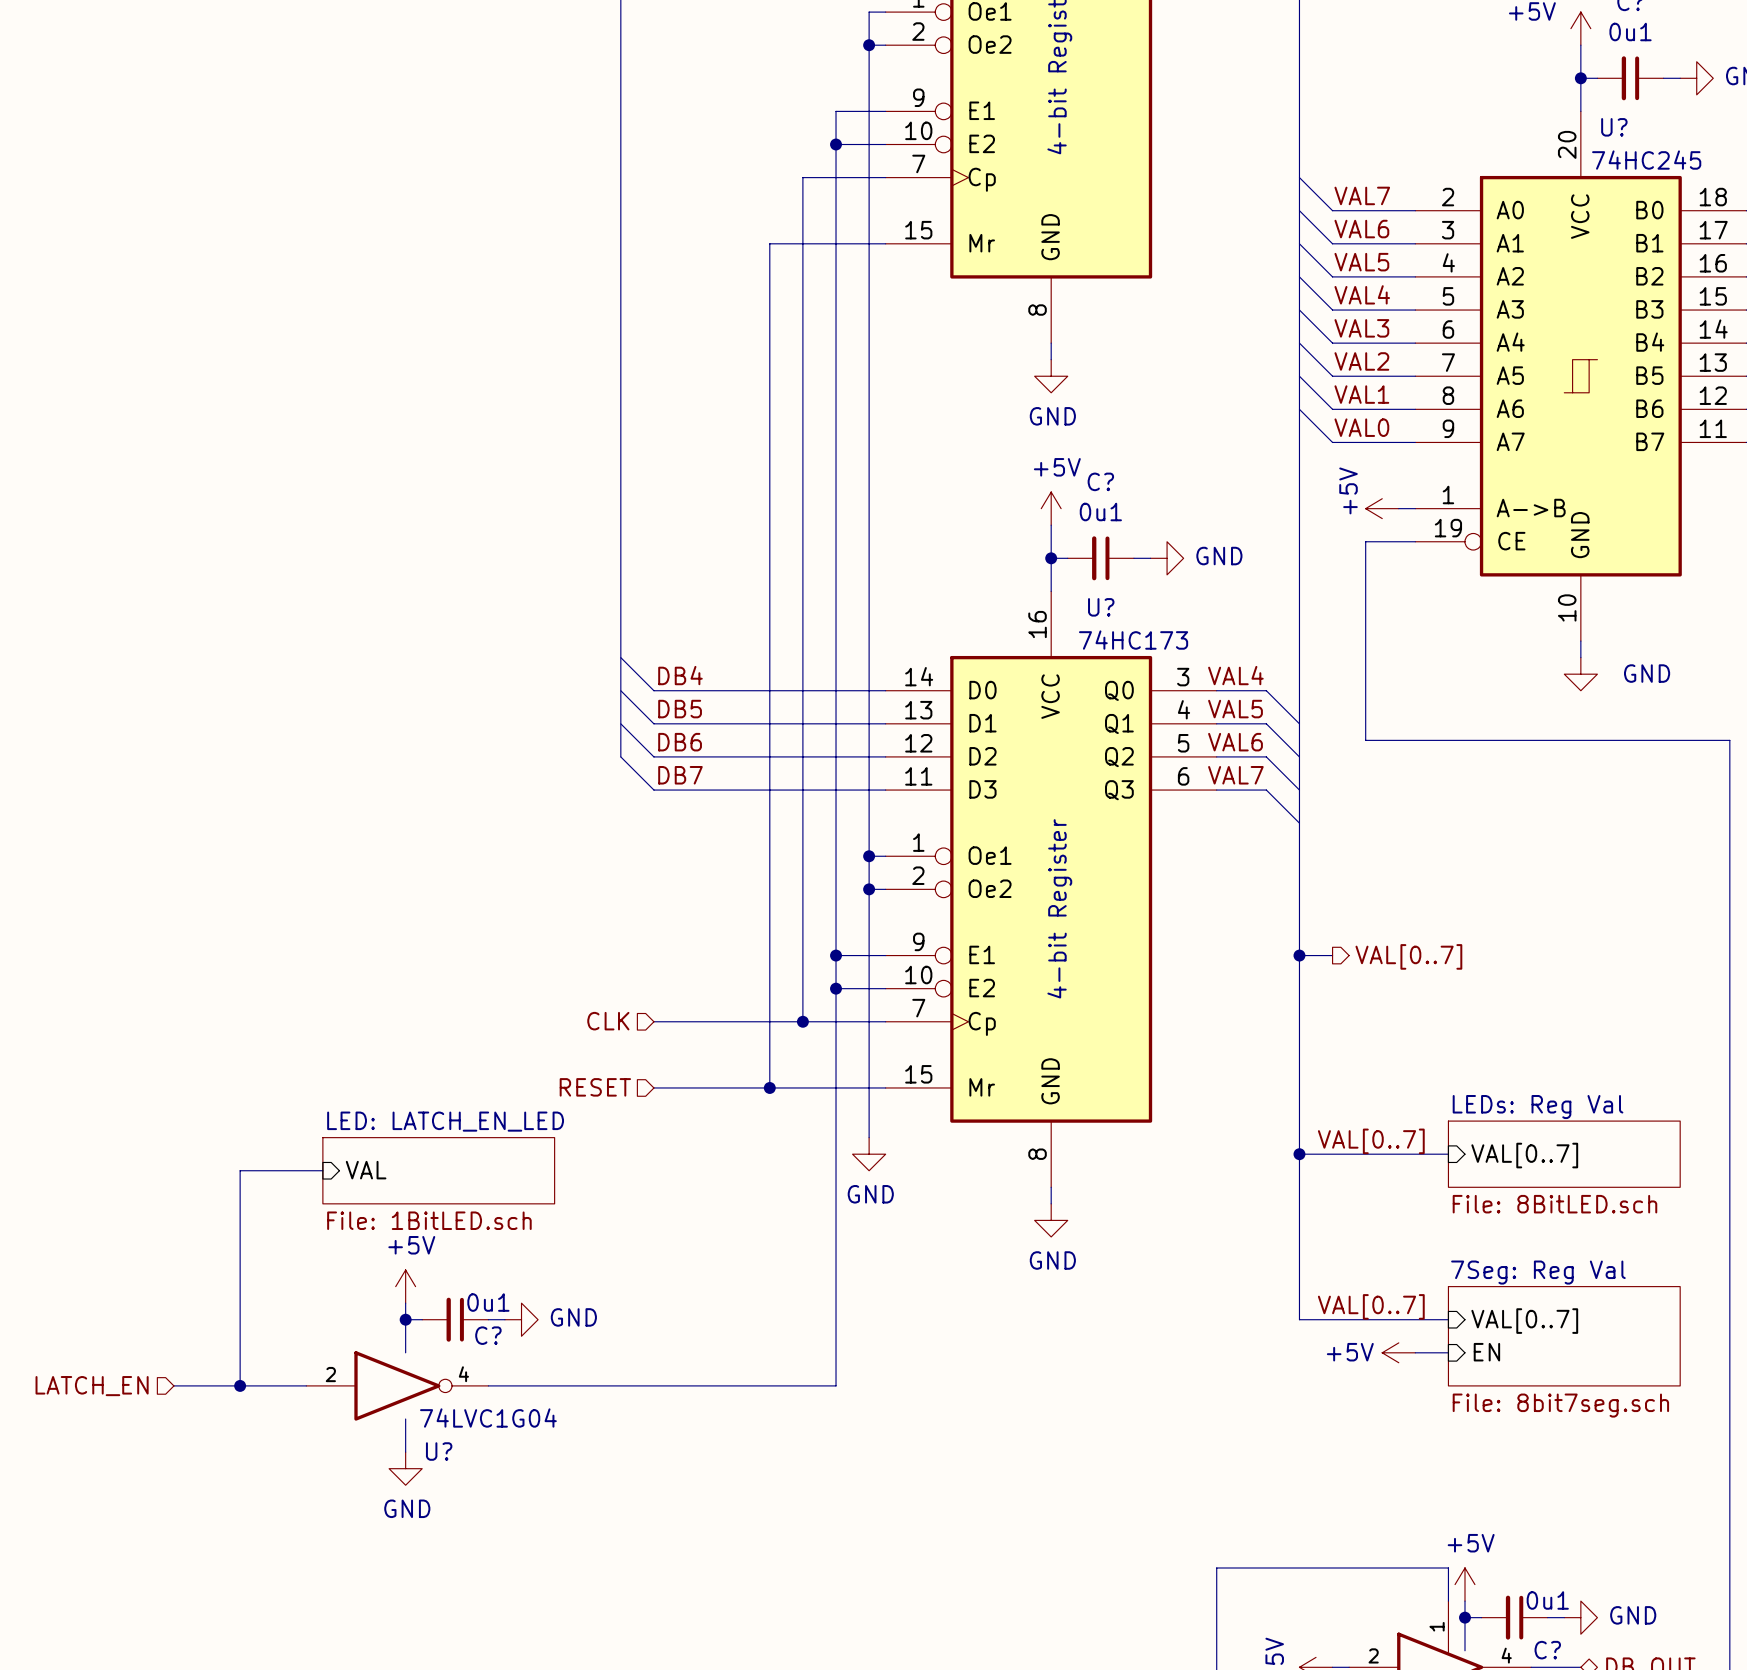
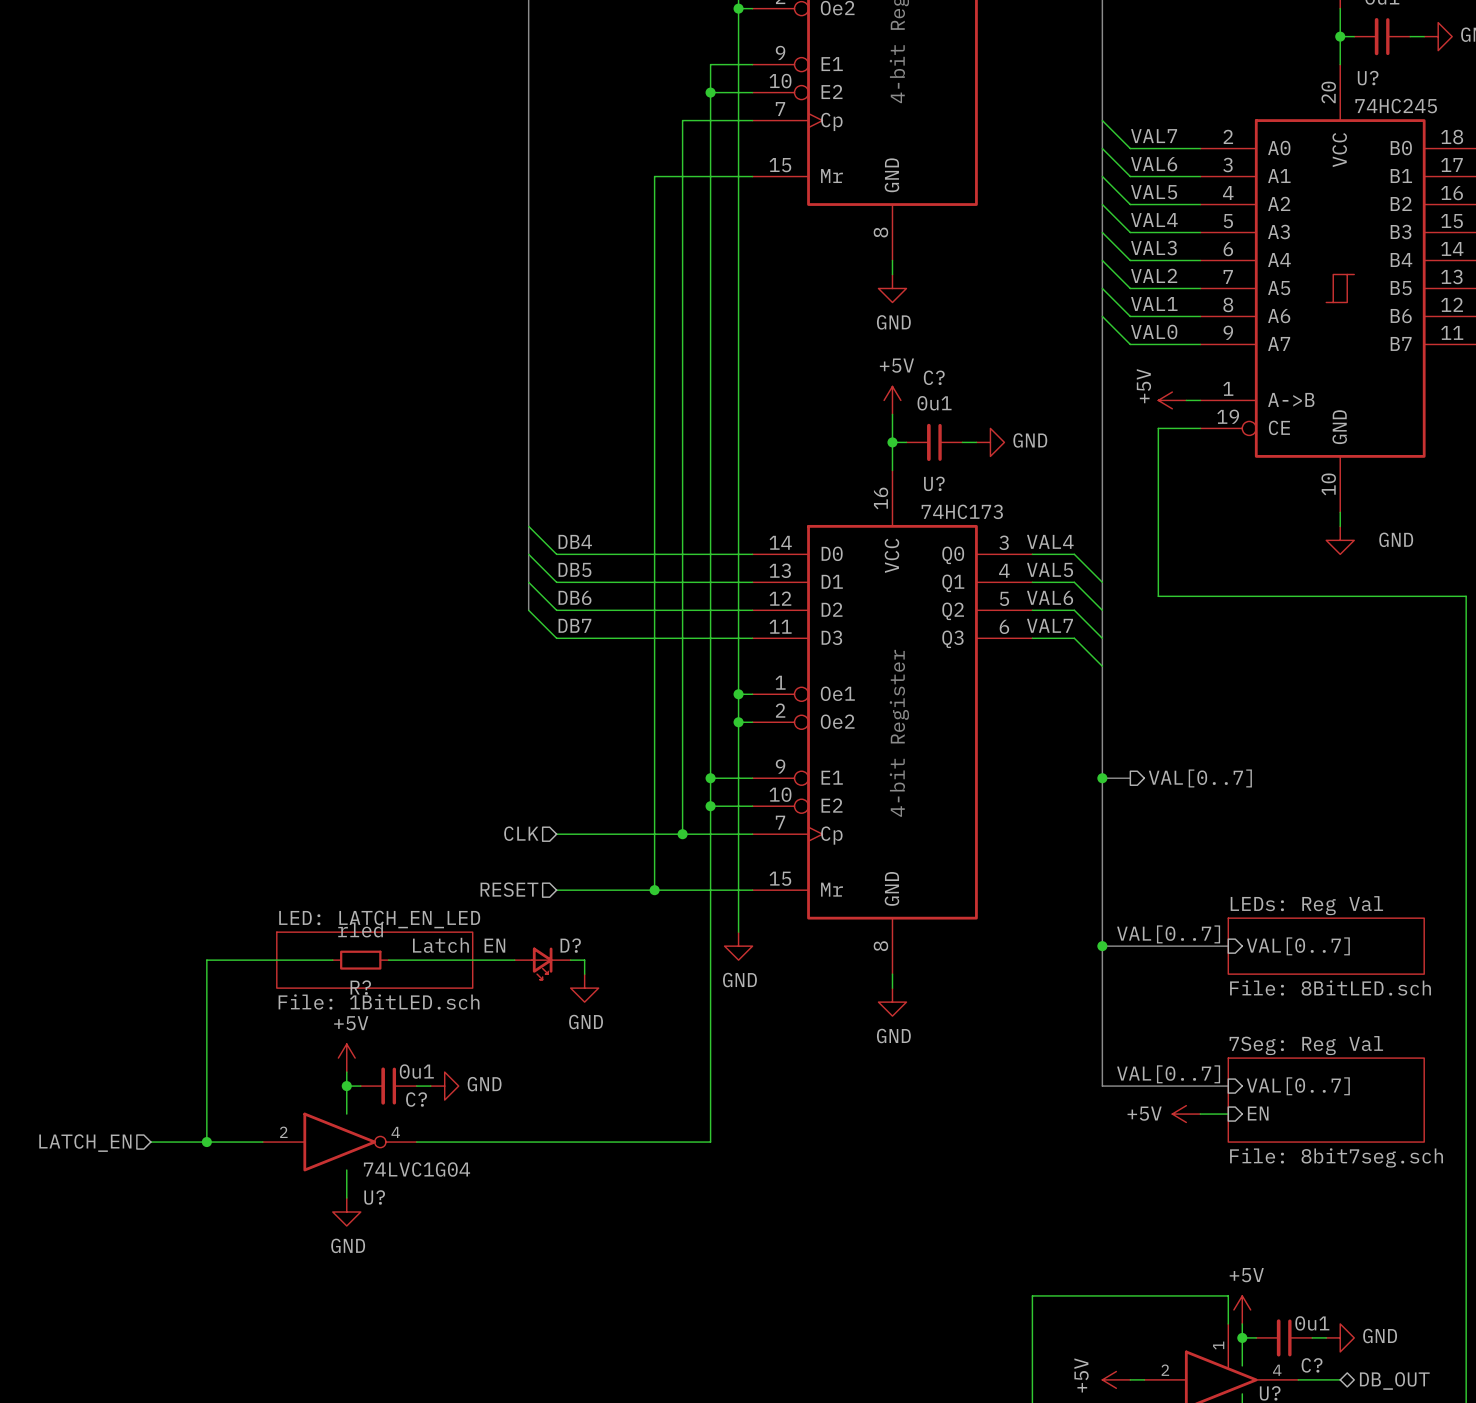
wire: none -> (276, 960) (332, 960)
sheet pin: VAL (366, 1170) -> none
R?: none -> rled (360, 960)
wire: none -> (388, 960) (514, 960)
wire: none -> (570, 960) (584, 960) (584, 974)
D?: none -> Latch EN (542, 963)
power symbol: none -> GND (584, 988)

